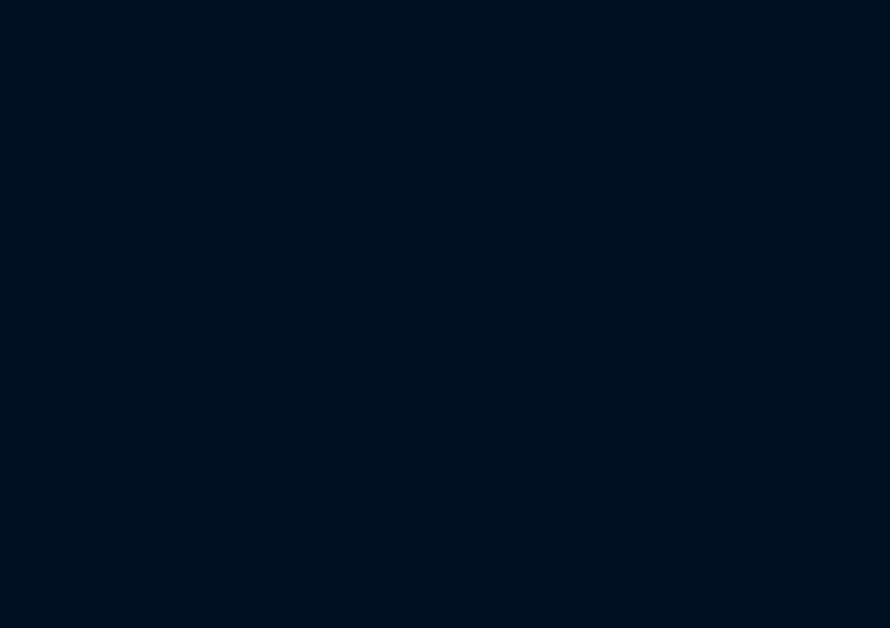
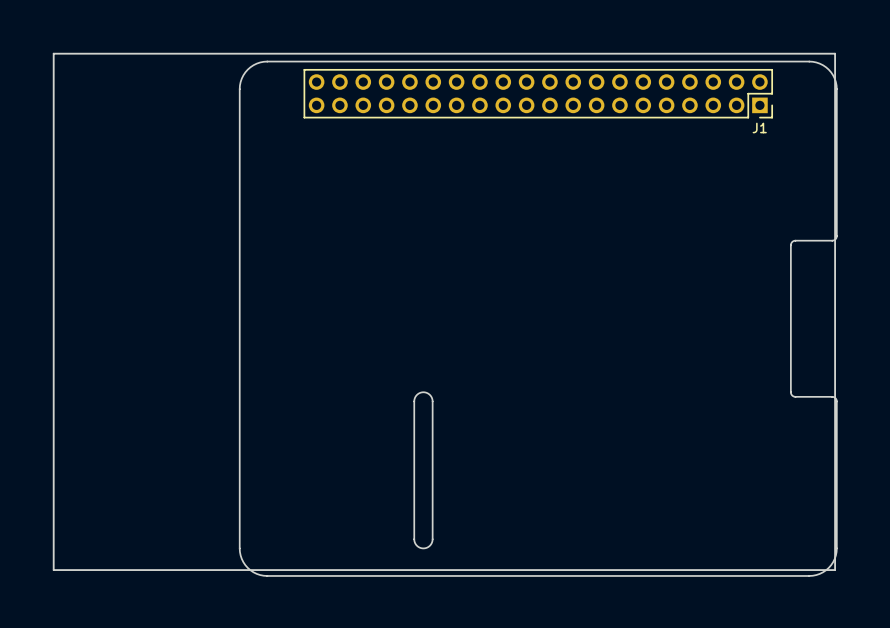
board edge: none -> (835, 53) (53, 53) (53, 570) (835, 570) (835, 53)
board edge: none -> (809, 61) (267, 61) (256, 63) (247, 69) (241, 78) (239, 89) (239, 548) (241, 558) (247, 567) (256, 573) (267, 575) (809, 575) (819, 573) (828, 567) (834, 558) (836, 548) (836, 400) (832, 396) (794, 396) (790, 392) (791, 244) (794, 240) (832, 240) (836, 236) (836, 85) (828, 69) (819, 63) (809, 61)
J1: none -> (538, 93)
board edge: none -> (432, 401) (432, 540) (429, 546) (422, 548) (416, 544) (414, 539) (414, 400) (417, 394) (424, 392) (430, 395) (432, 401)

